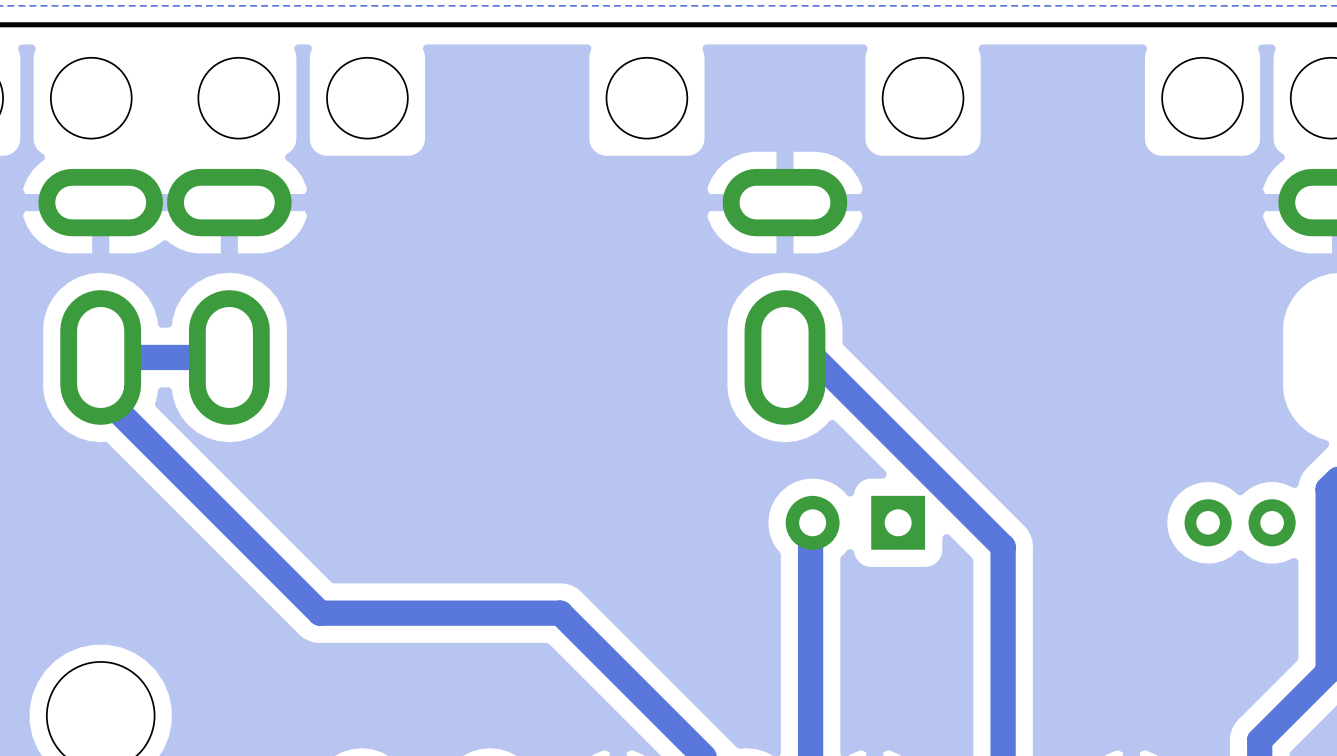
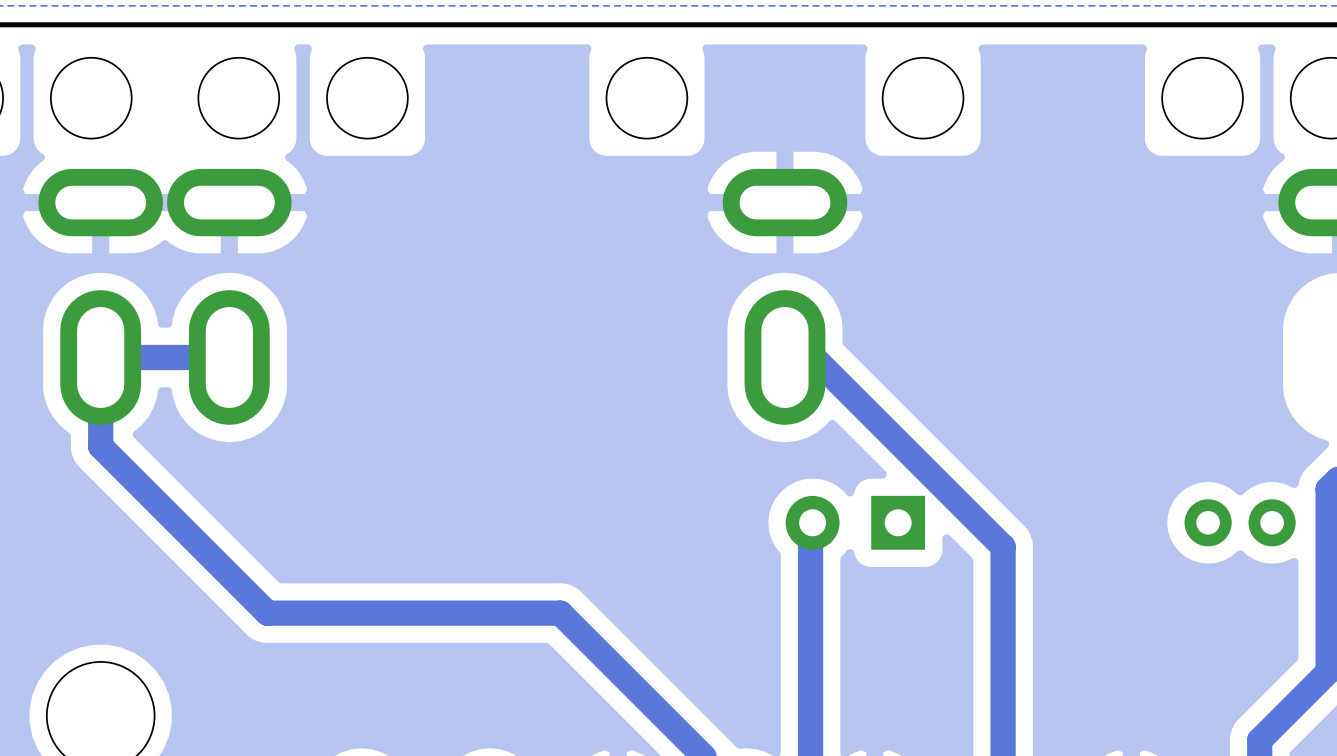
track: (100, 393) (320, 613) -> (100, 393) (100, 446) (267, 613) (320, 613)

